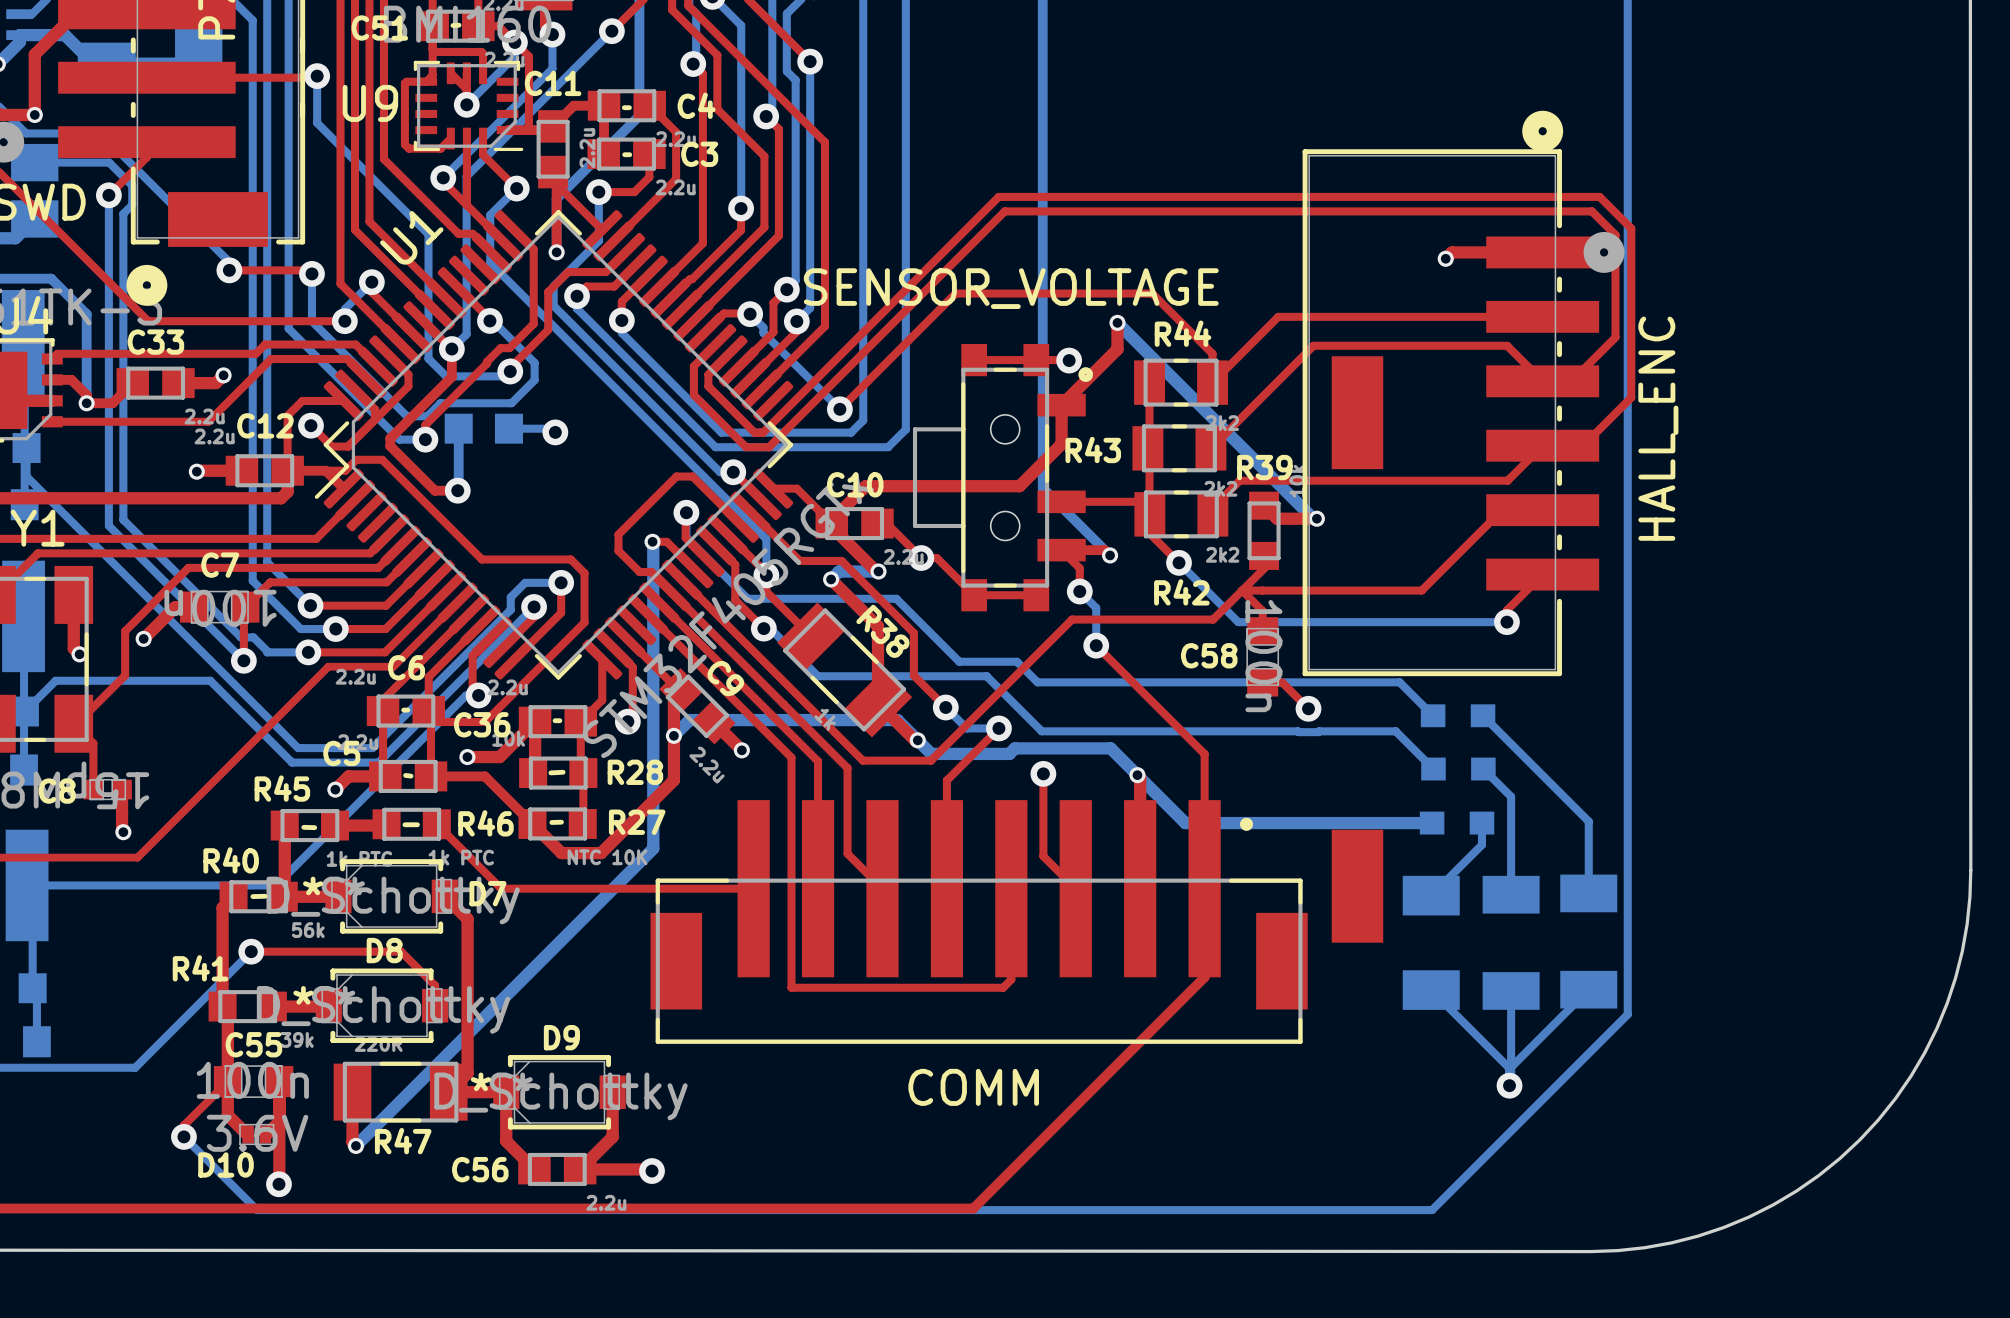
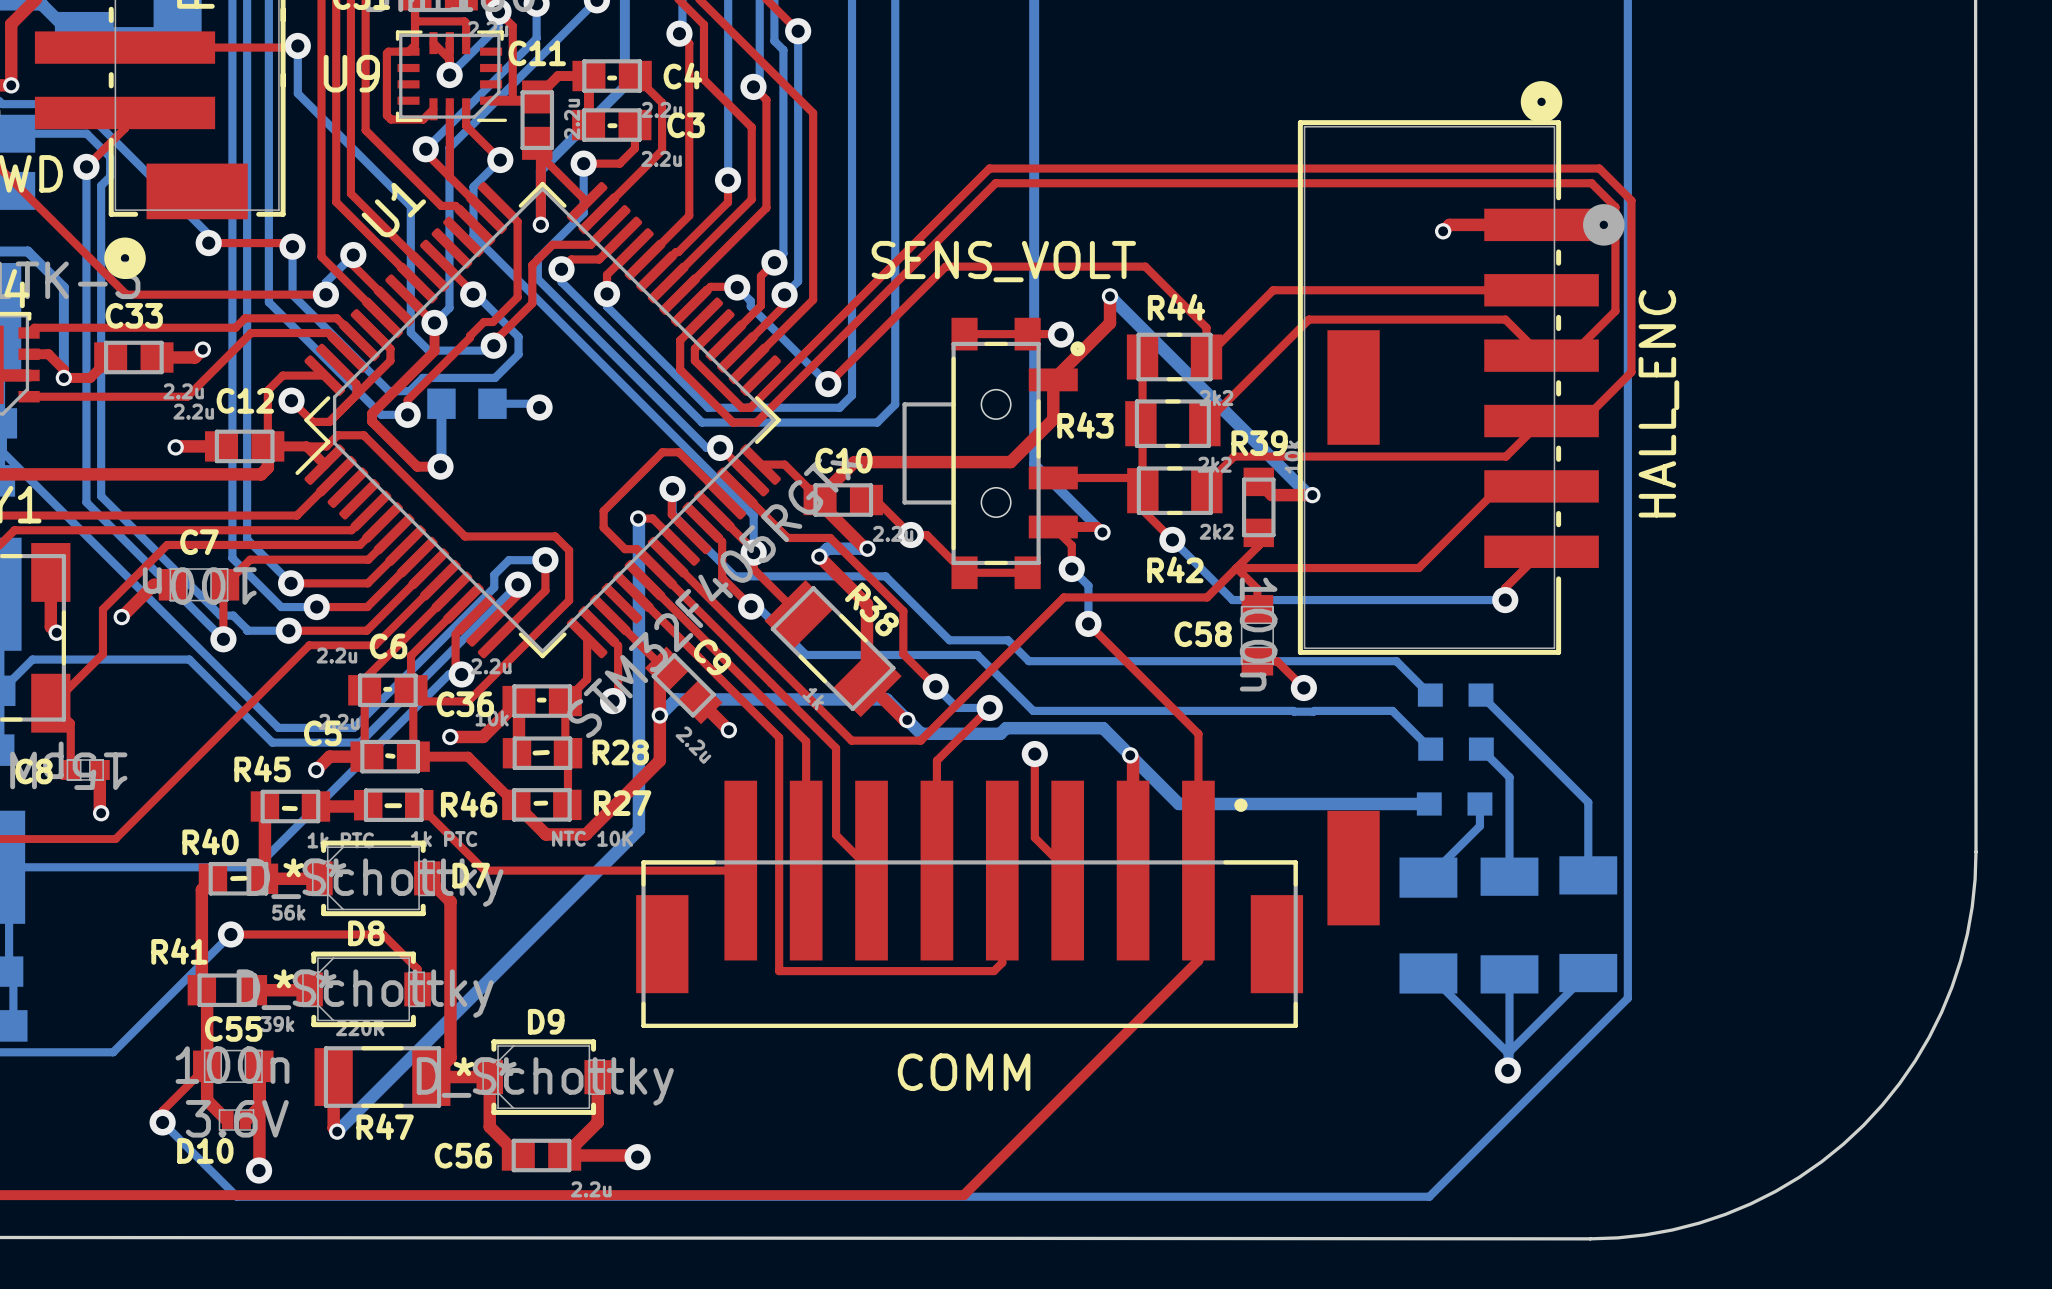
part value: SENSOR_VOLTAGE (1011, 288) -> SENS_VOLT (1003, 261)

